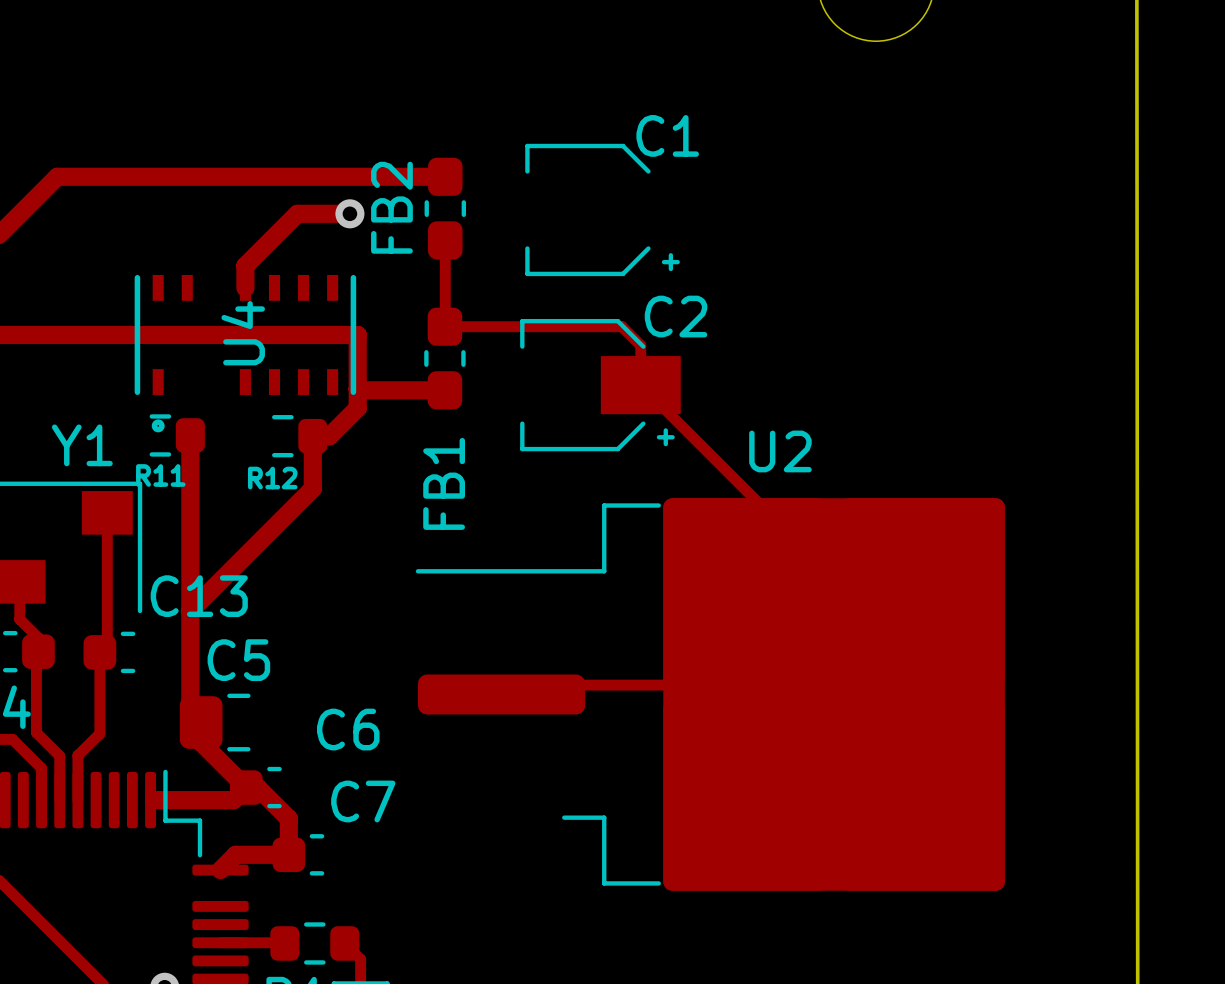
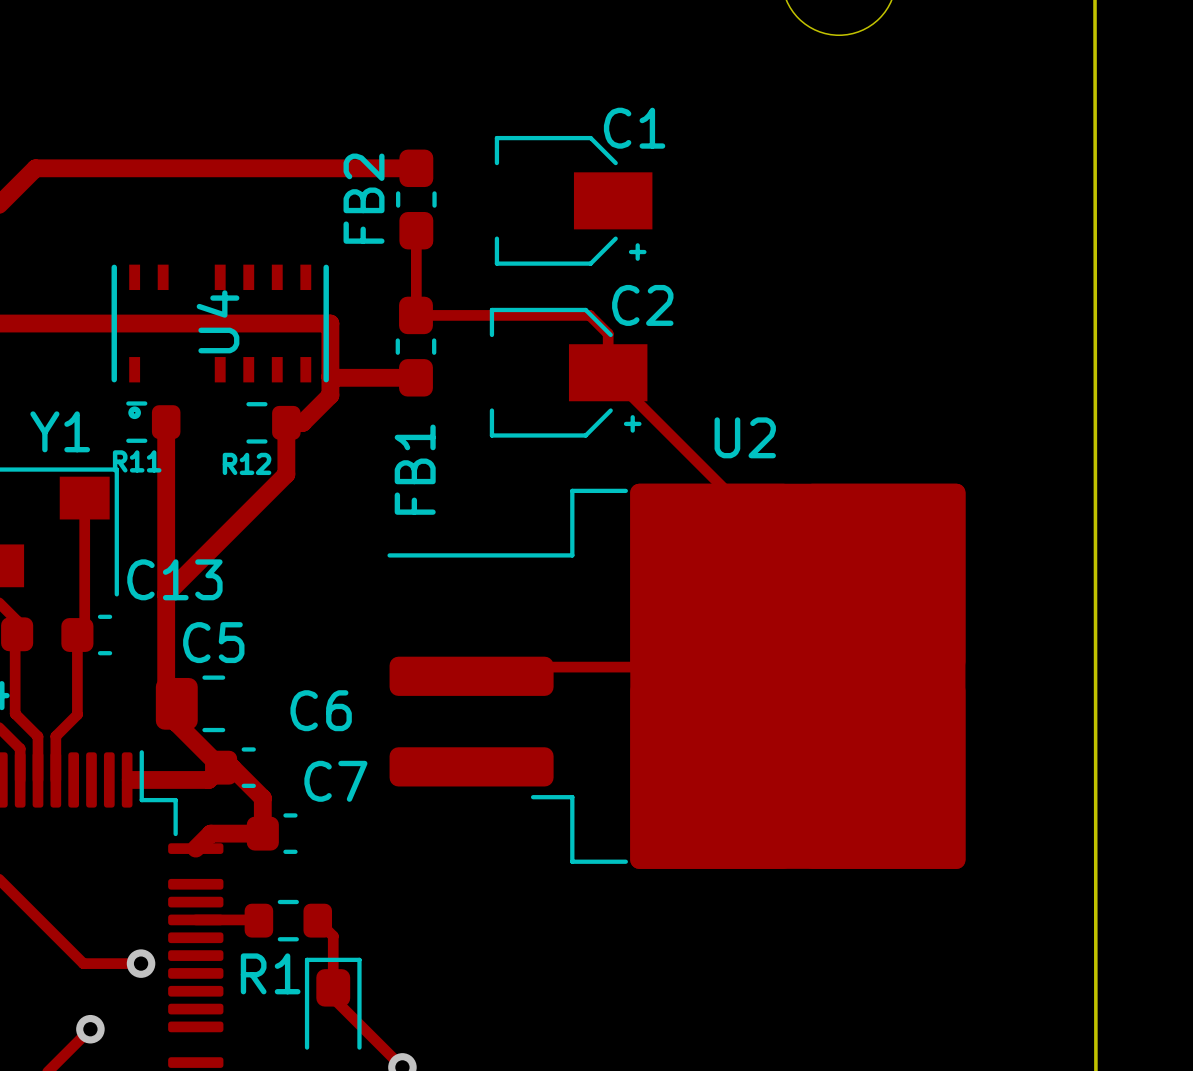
C1 footprint: [525, 143, 680, 277] -> [494, 135, 653, 266]
track: (349, 213) (297, 213) (245, 265) (245, 287) -> none
via: (349, 213) -> none
U2 footprint: [415, 498, 1005, 891] -> [387, 483, 966, 869]

